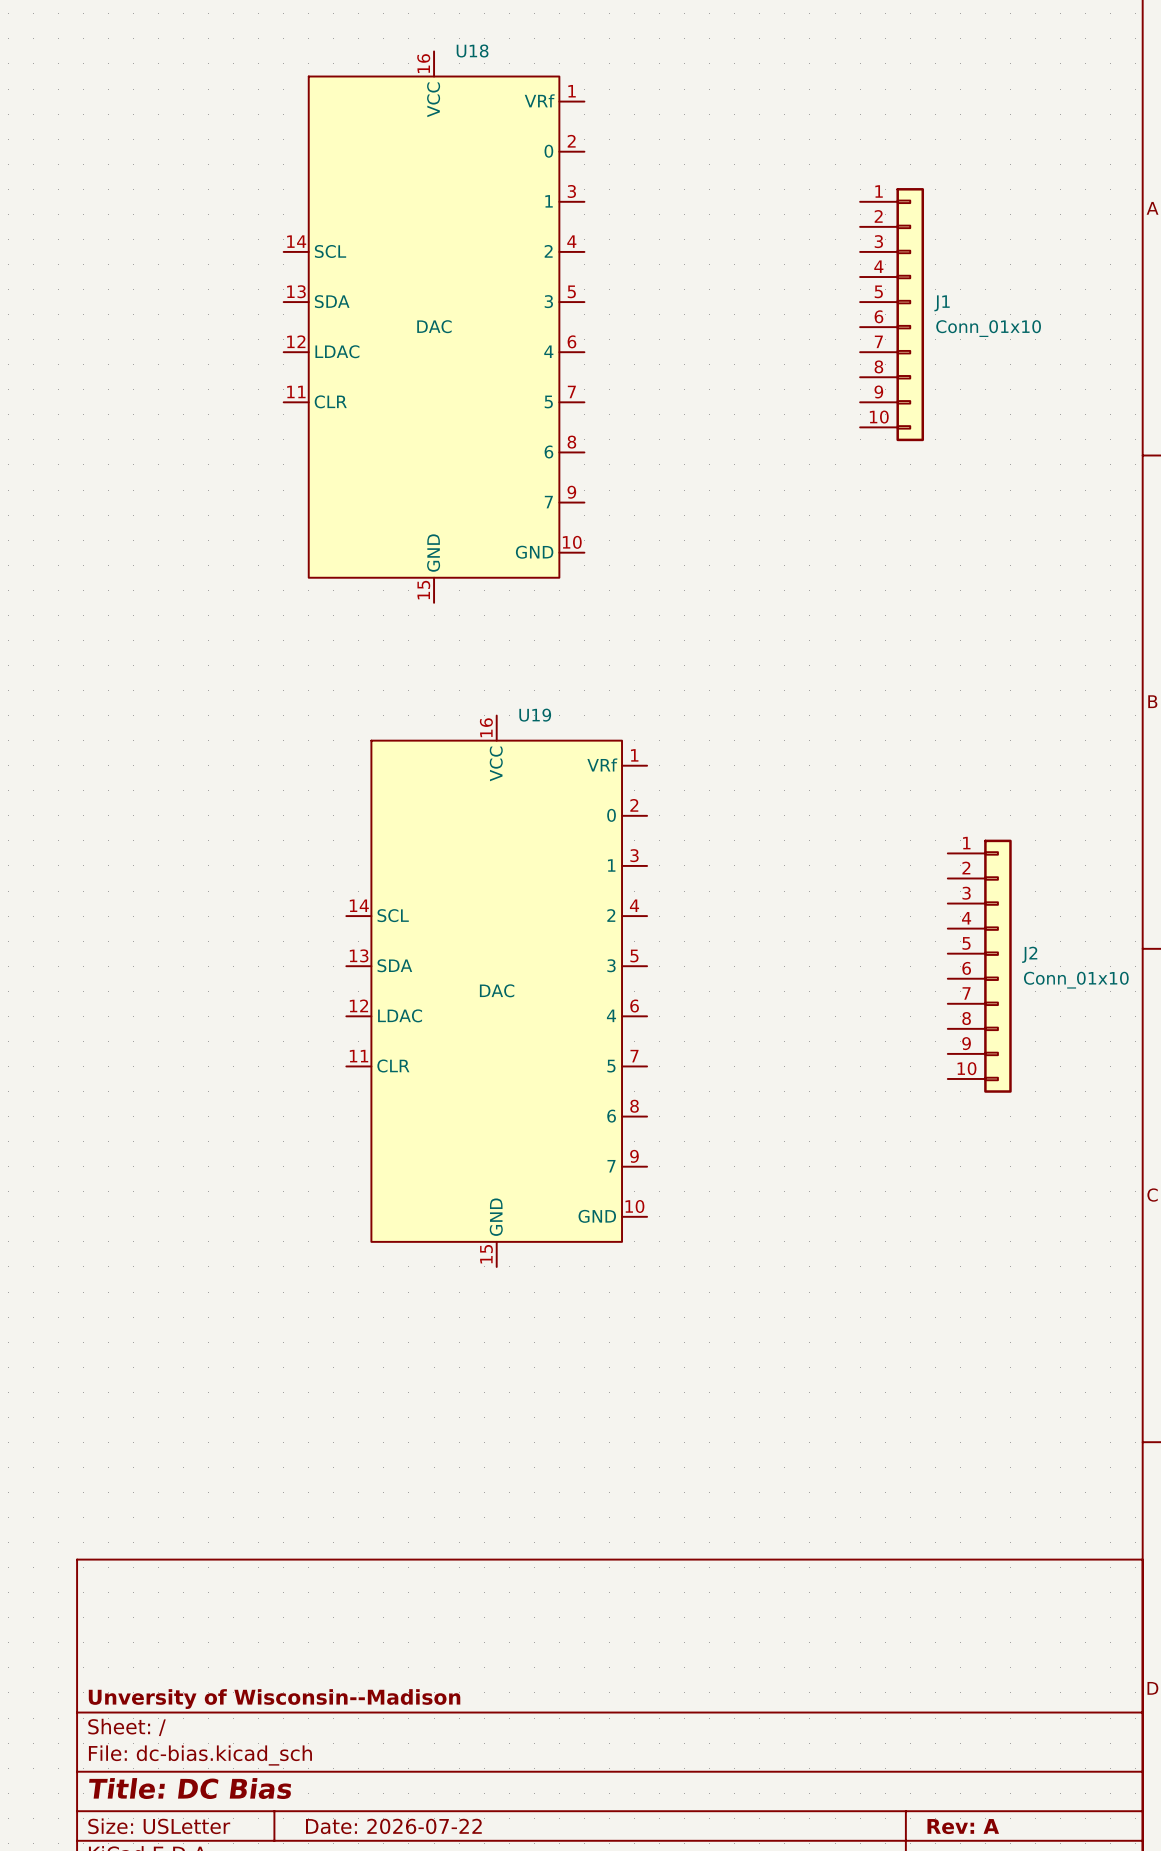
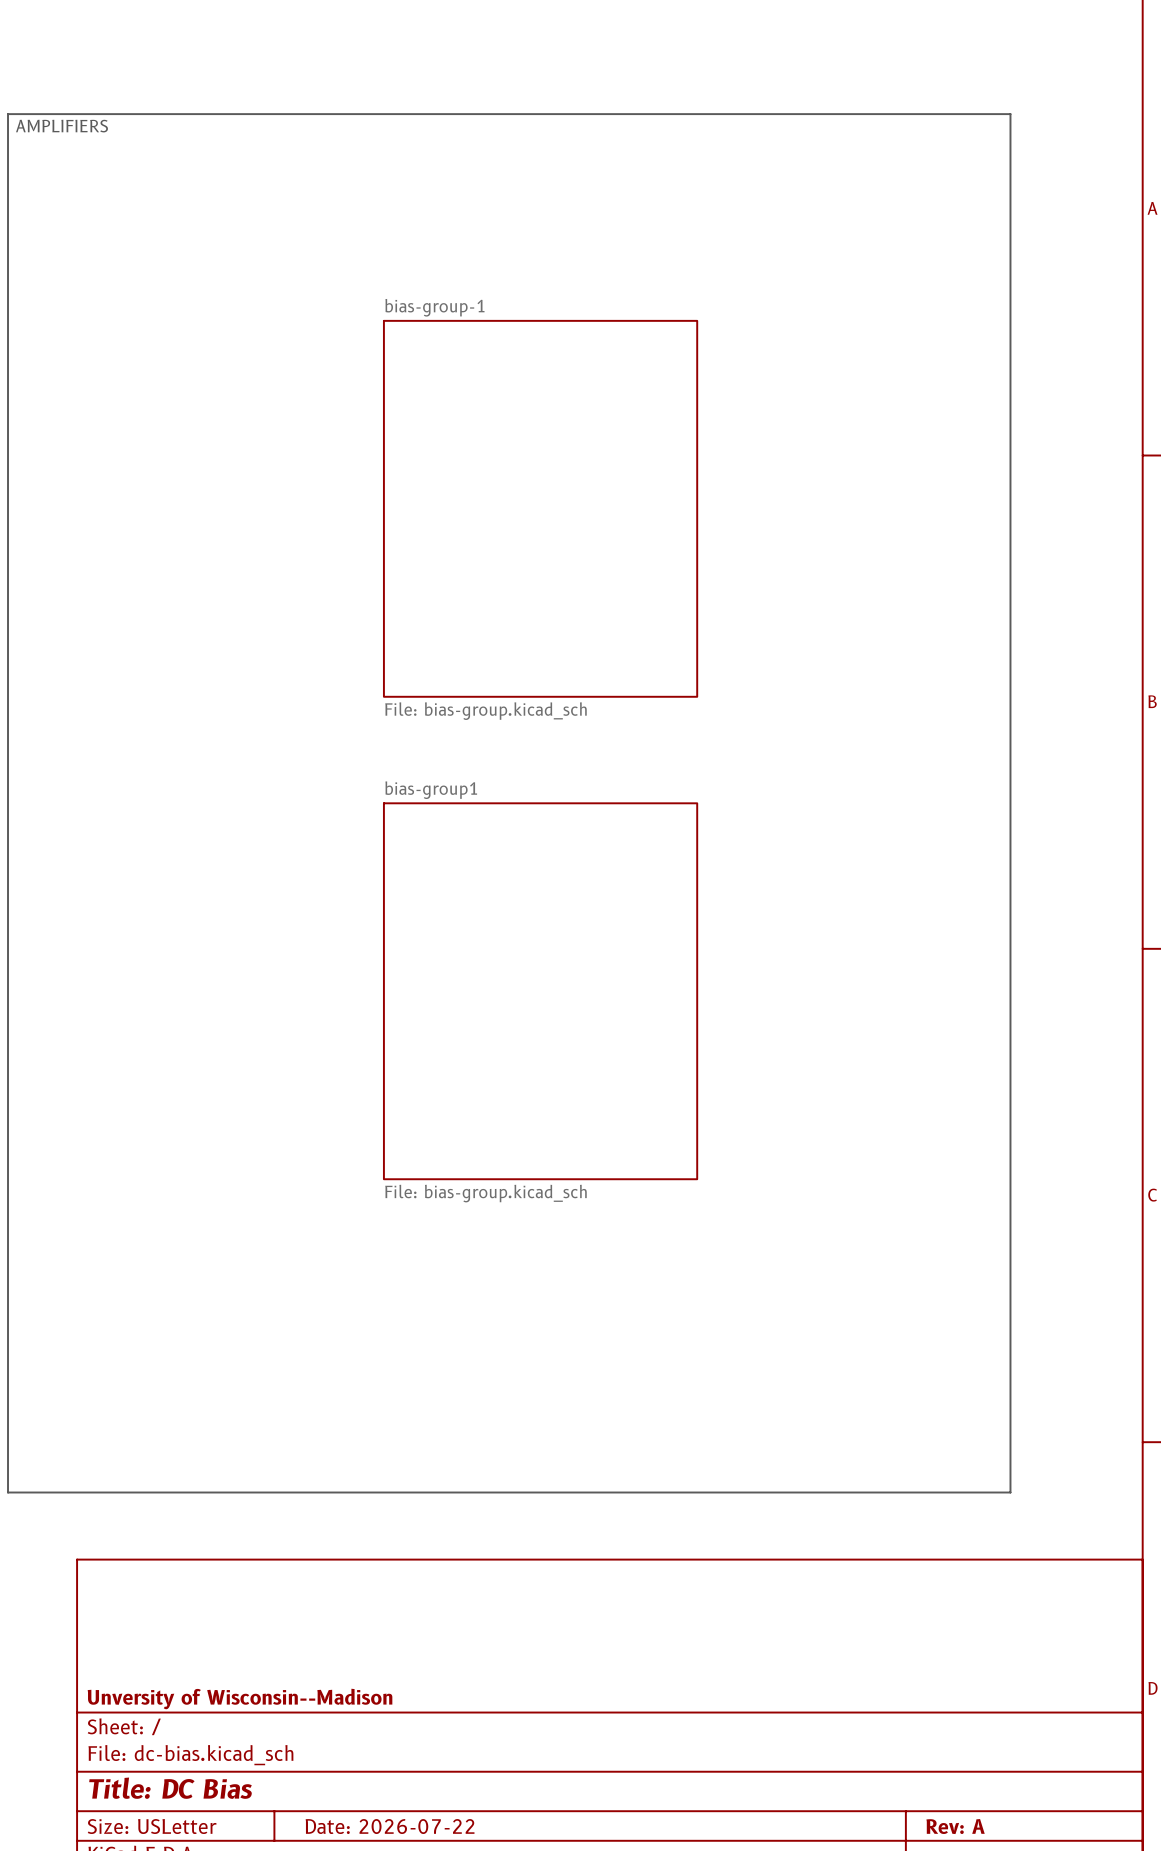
line: none -> (8, 114) (1010, 114) (1010, 1492) (8, 1492) (8, 114)
text: none -> AMPLIFIERS (61, 126)
J1: Conn_01x10 (892, 314) -> none
U18: DAC (434, 327) -> none
sheet bias-group-1: none -> File: bias-group.kicad_sch (540, 508)
J2: Conn_01x10 (979, 966) -> none
U19: DAC (496, 991) -> none
sheet bias-group1: none -> File: bias-group.kicad_sch (540, 991)

